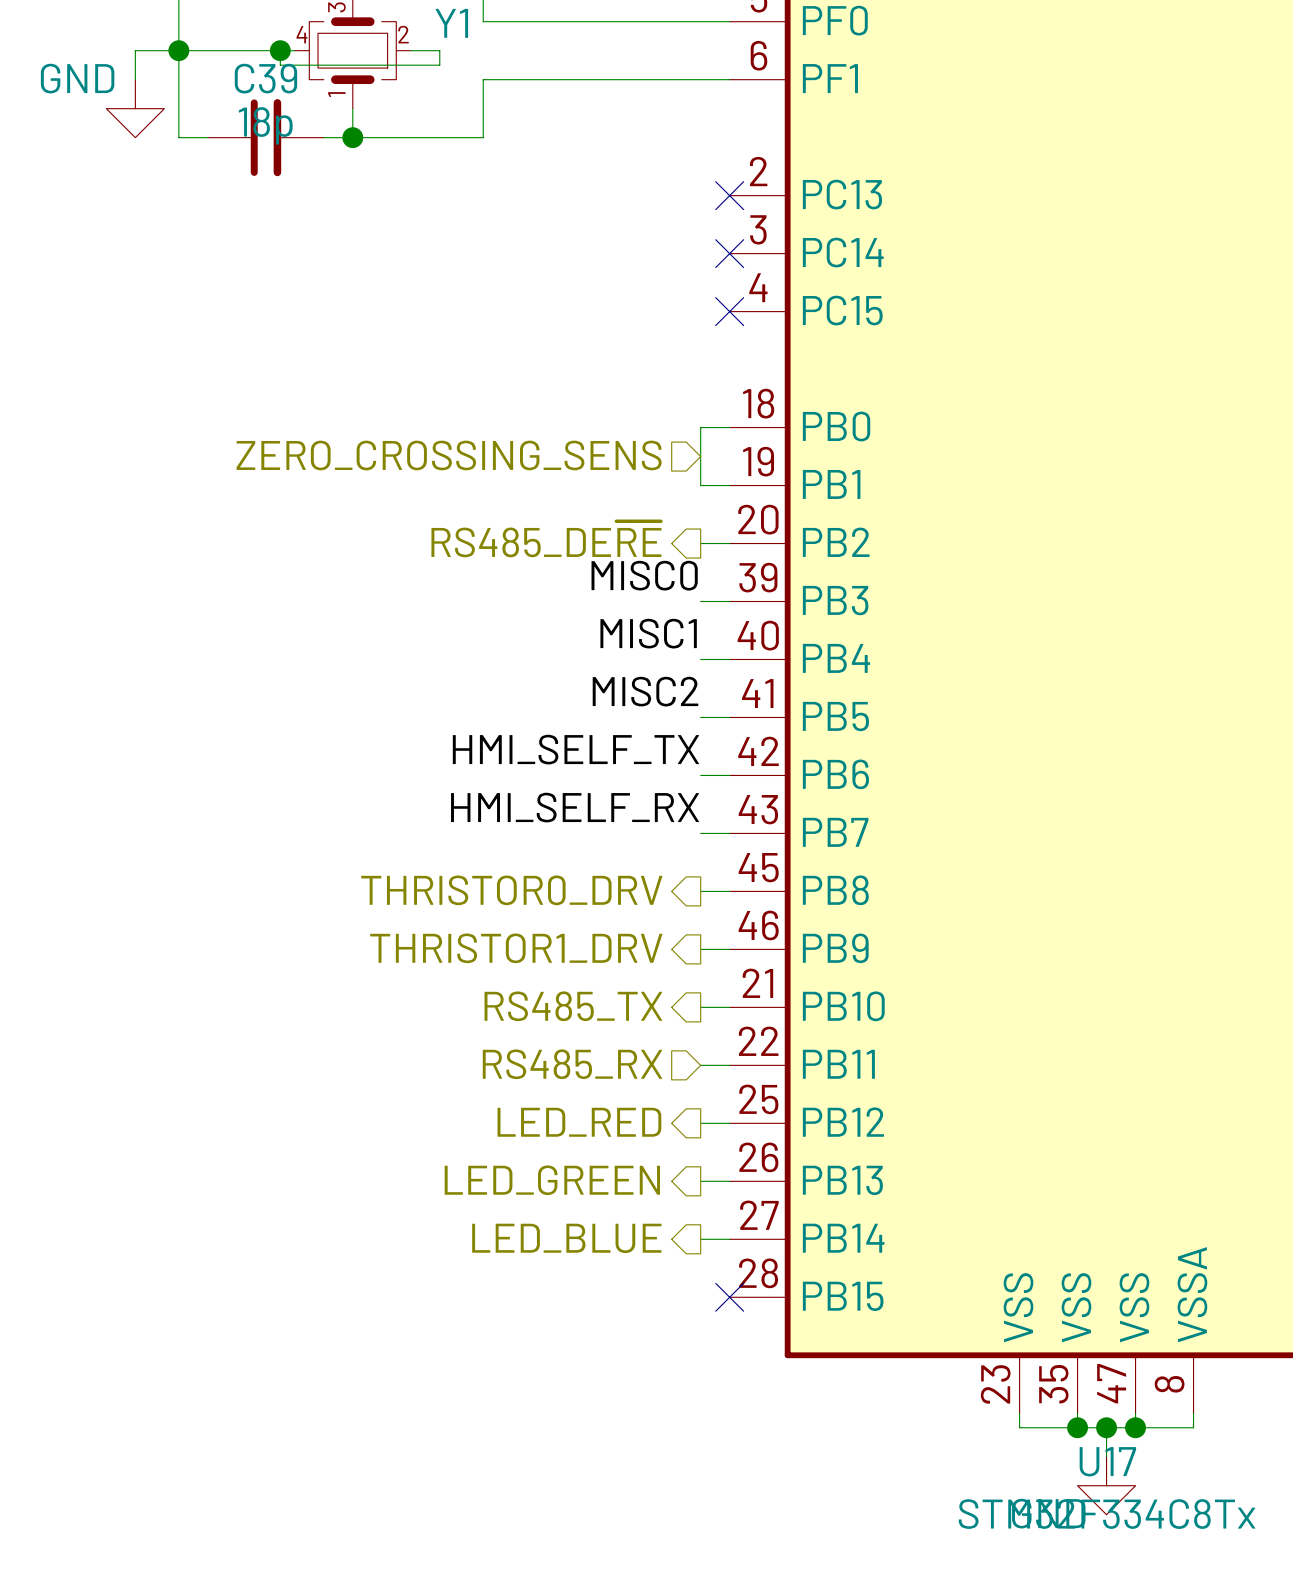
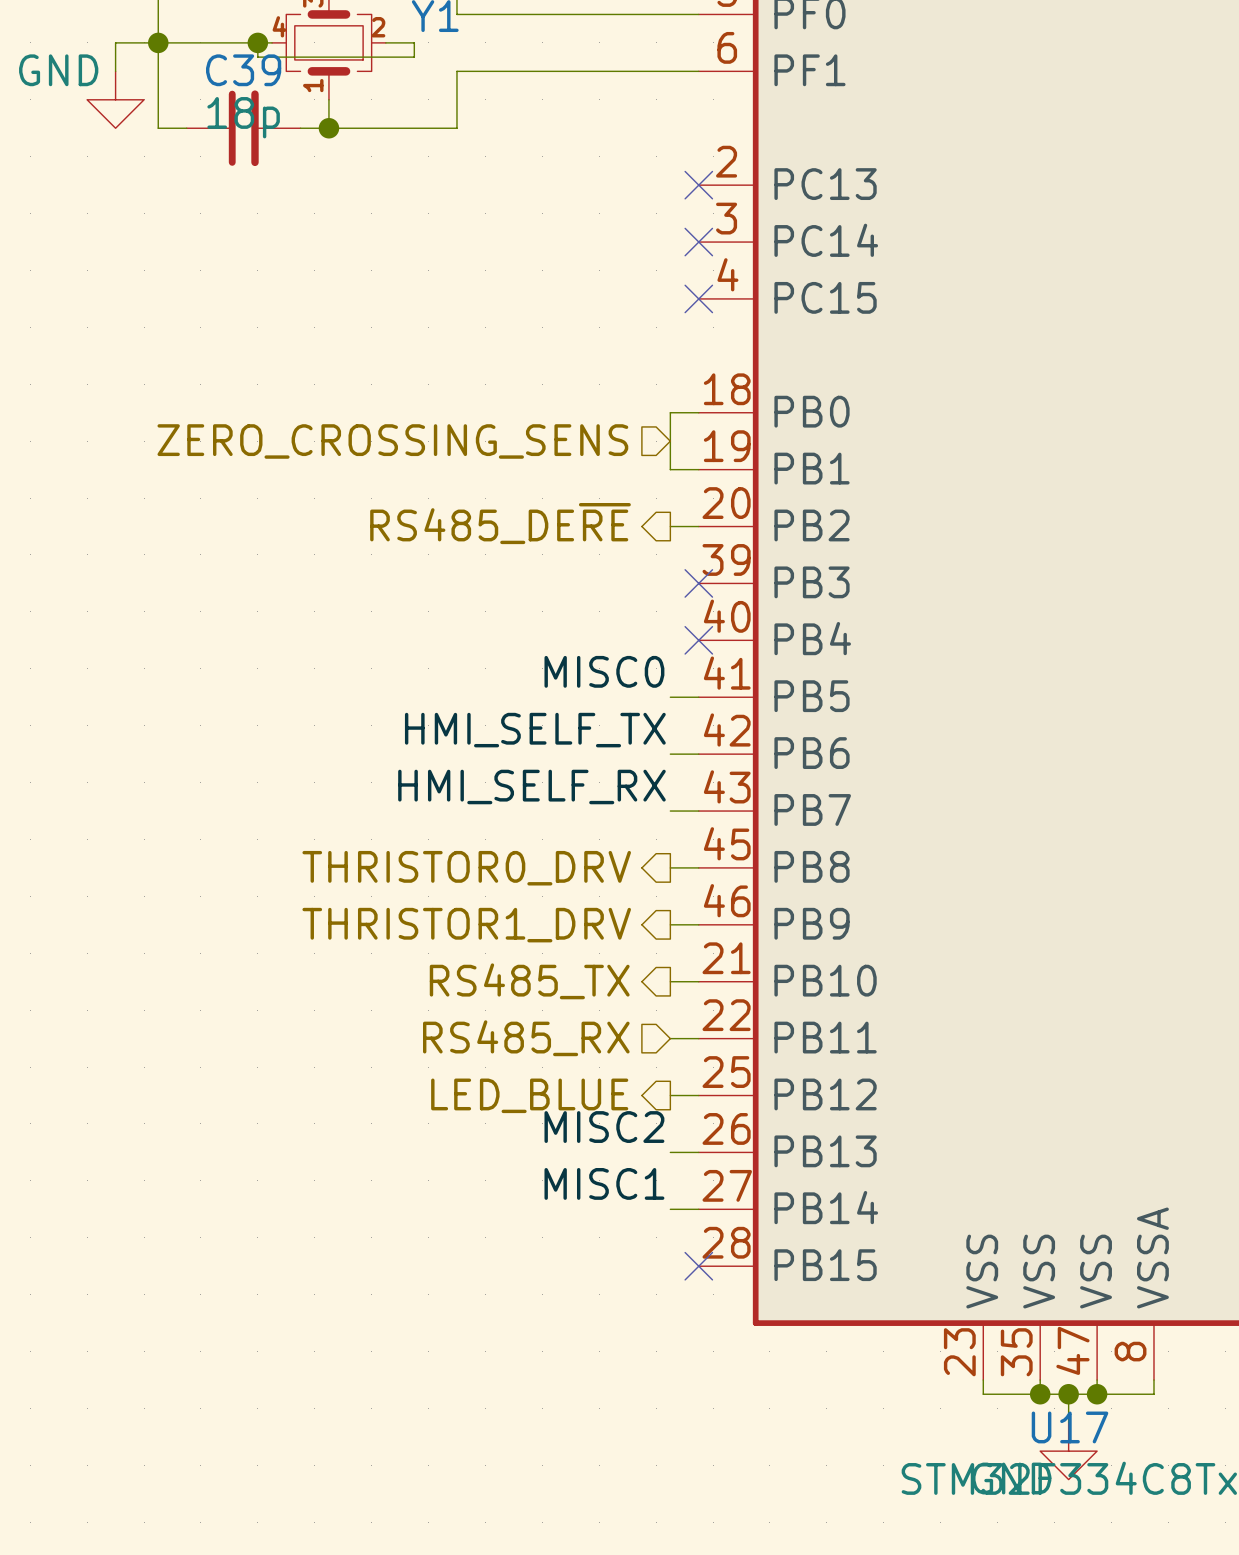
label: MISC0 (644, 575) -> none
wire: (700, 601) (729, 601) -> none
no-connect mark: none -> (698, 583)
label: MISC1 (648, 633) -> none
wire: (700, 659) (729, 659) -> none
no-connect mark: none -> (698, 640)
label: MISC2 (645, 691) -> MISC0 (604, 671)
hierarchical label: LED_RED (579, 1122) -> LED_BLUE (529, 1095)
label: none -> MISC2 (604, 1127)
hierarchical label: LED_GREEN (552, 1180) -> none
label: none -> MISC1 (604, 1183)
hierarchical label: LED_BLUE (566, 1238) -> none

